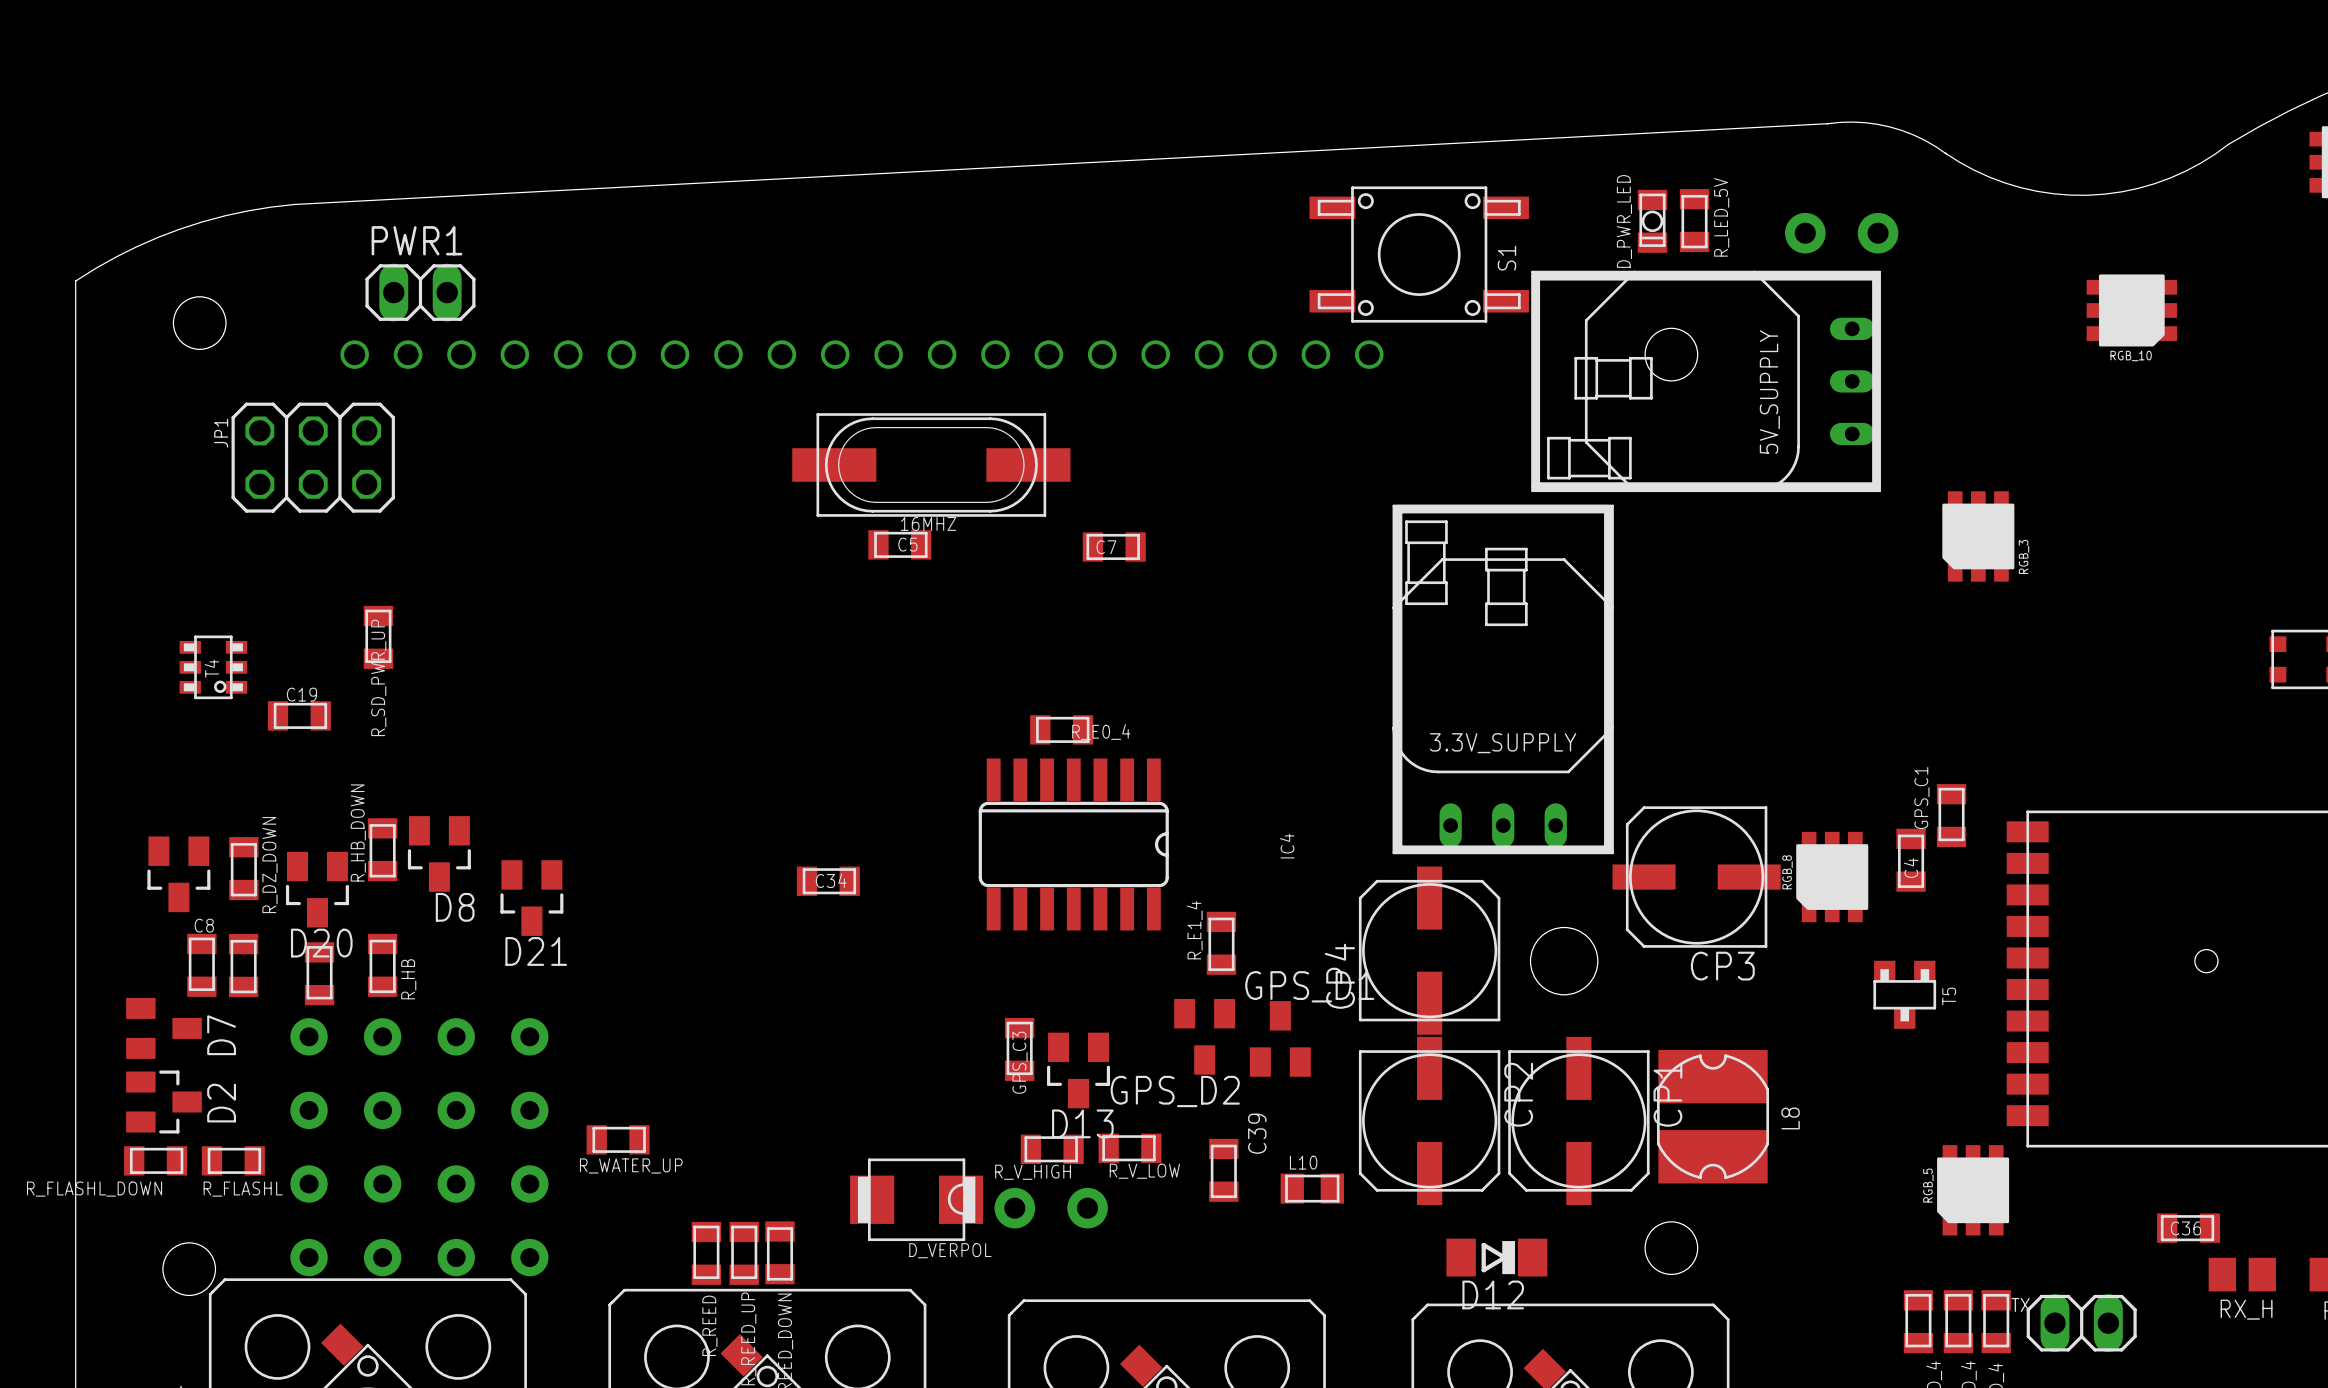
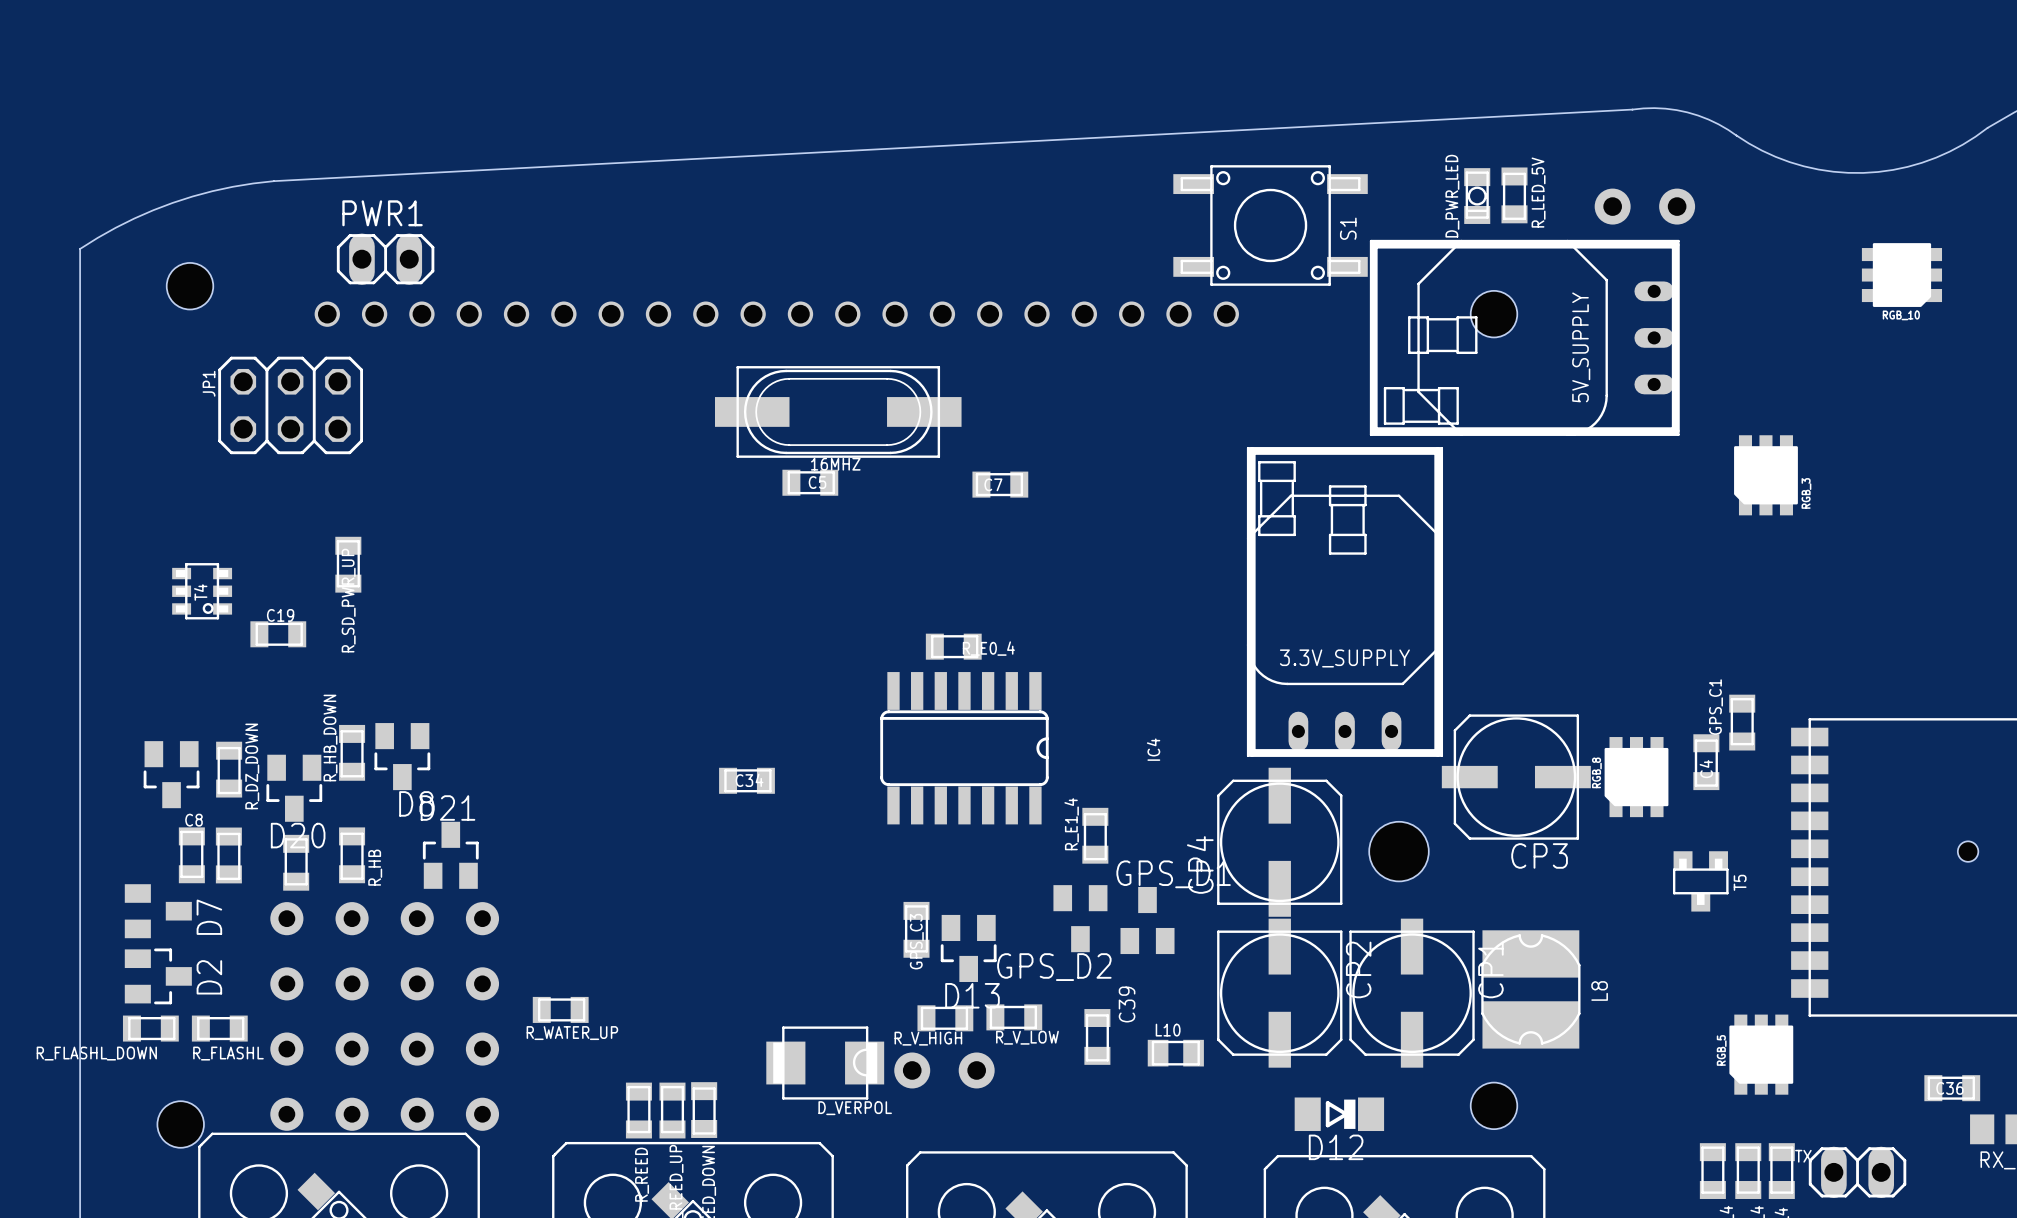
D21 rotation: 0° (531, 898) -> 180° (450, 855)
D21 position: (531, 898) -> (450, 855)

